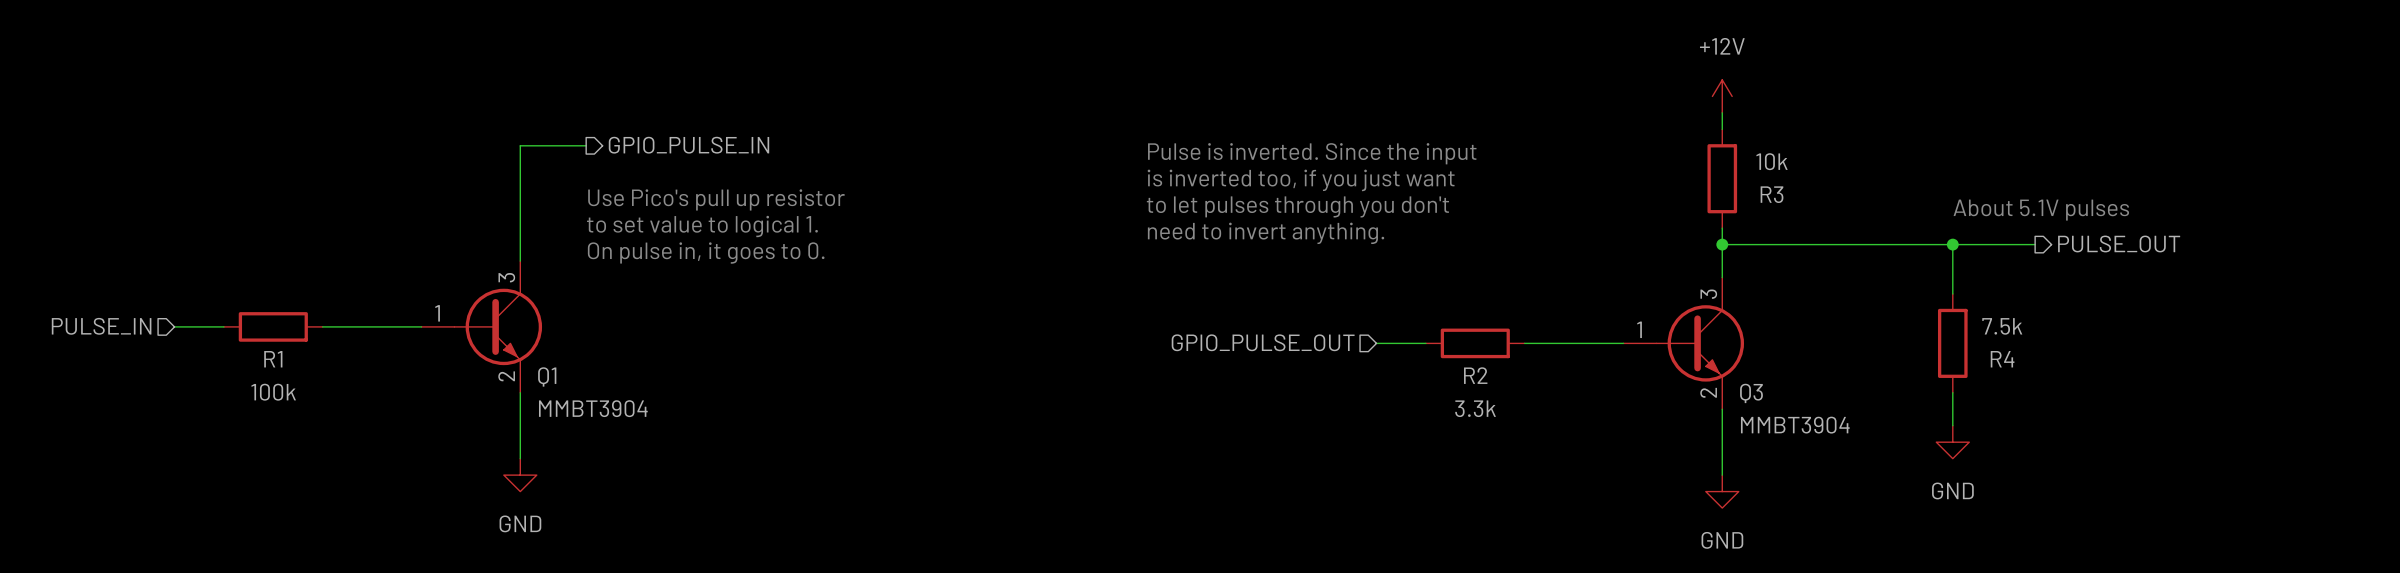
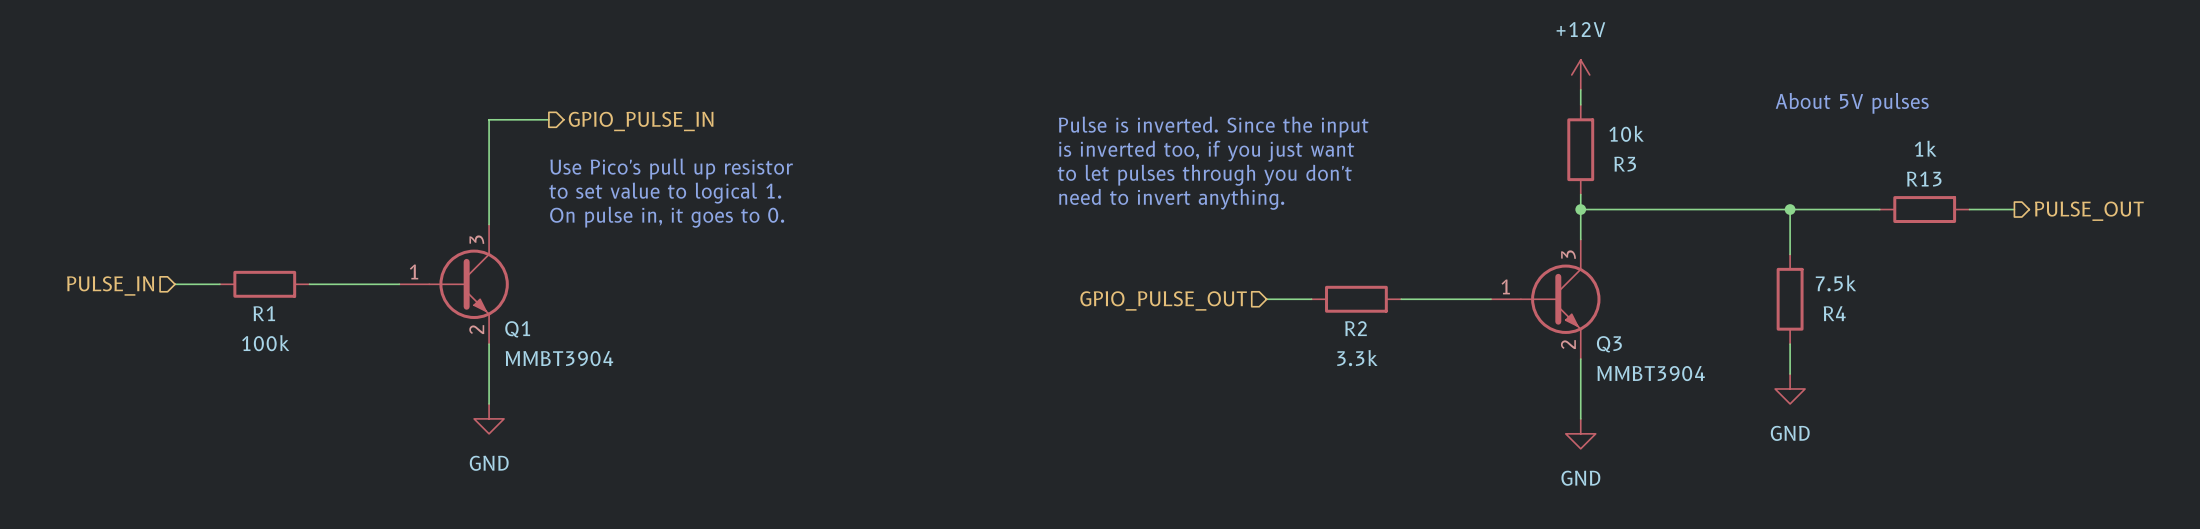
text: none -> About 5V pulses (1852, 103)
text: About 5.1V pulses (2041, 210) -> none
hierarchical label position: PULSE_OUT (2119, 243) -> PULSE_OUT (2089, 211)
wire: none -> (1864, 209) (1879, 209)
R13: none -> 1k (1924, 209)
wire: none -> (1969, 209) (2014, 209)

